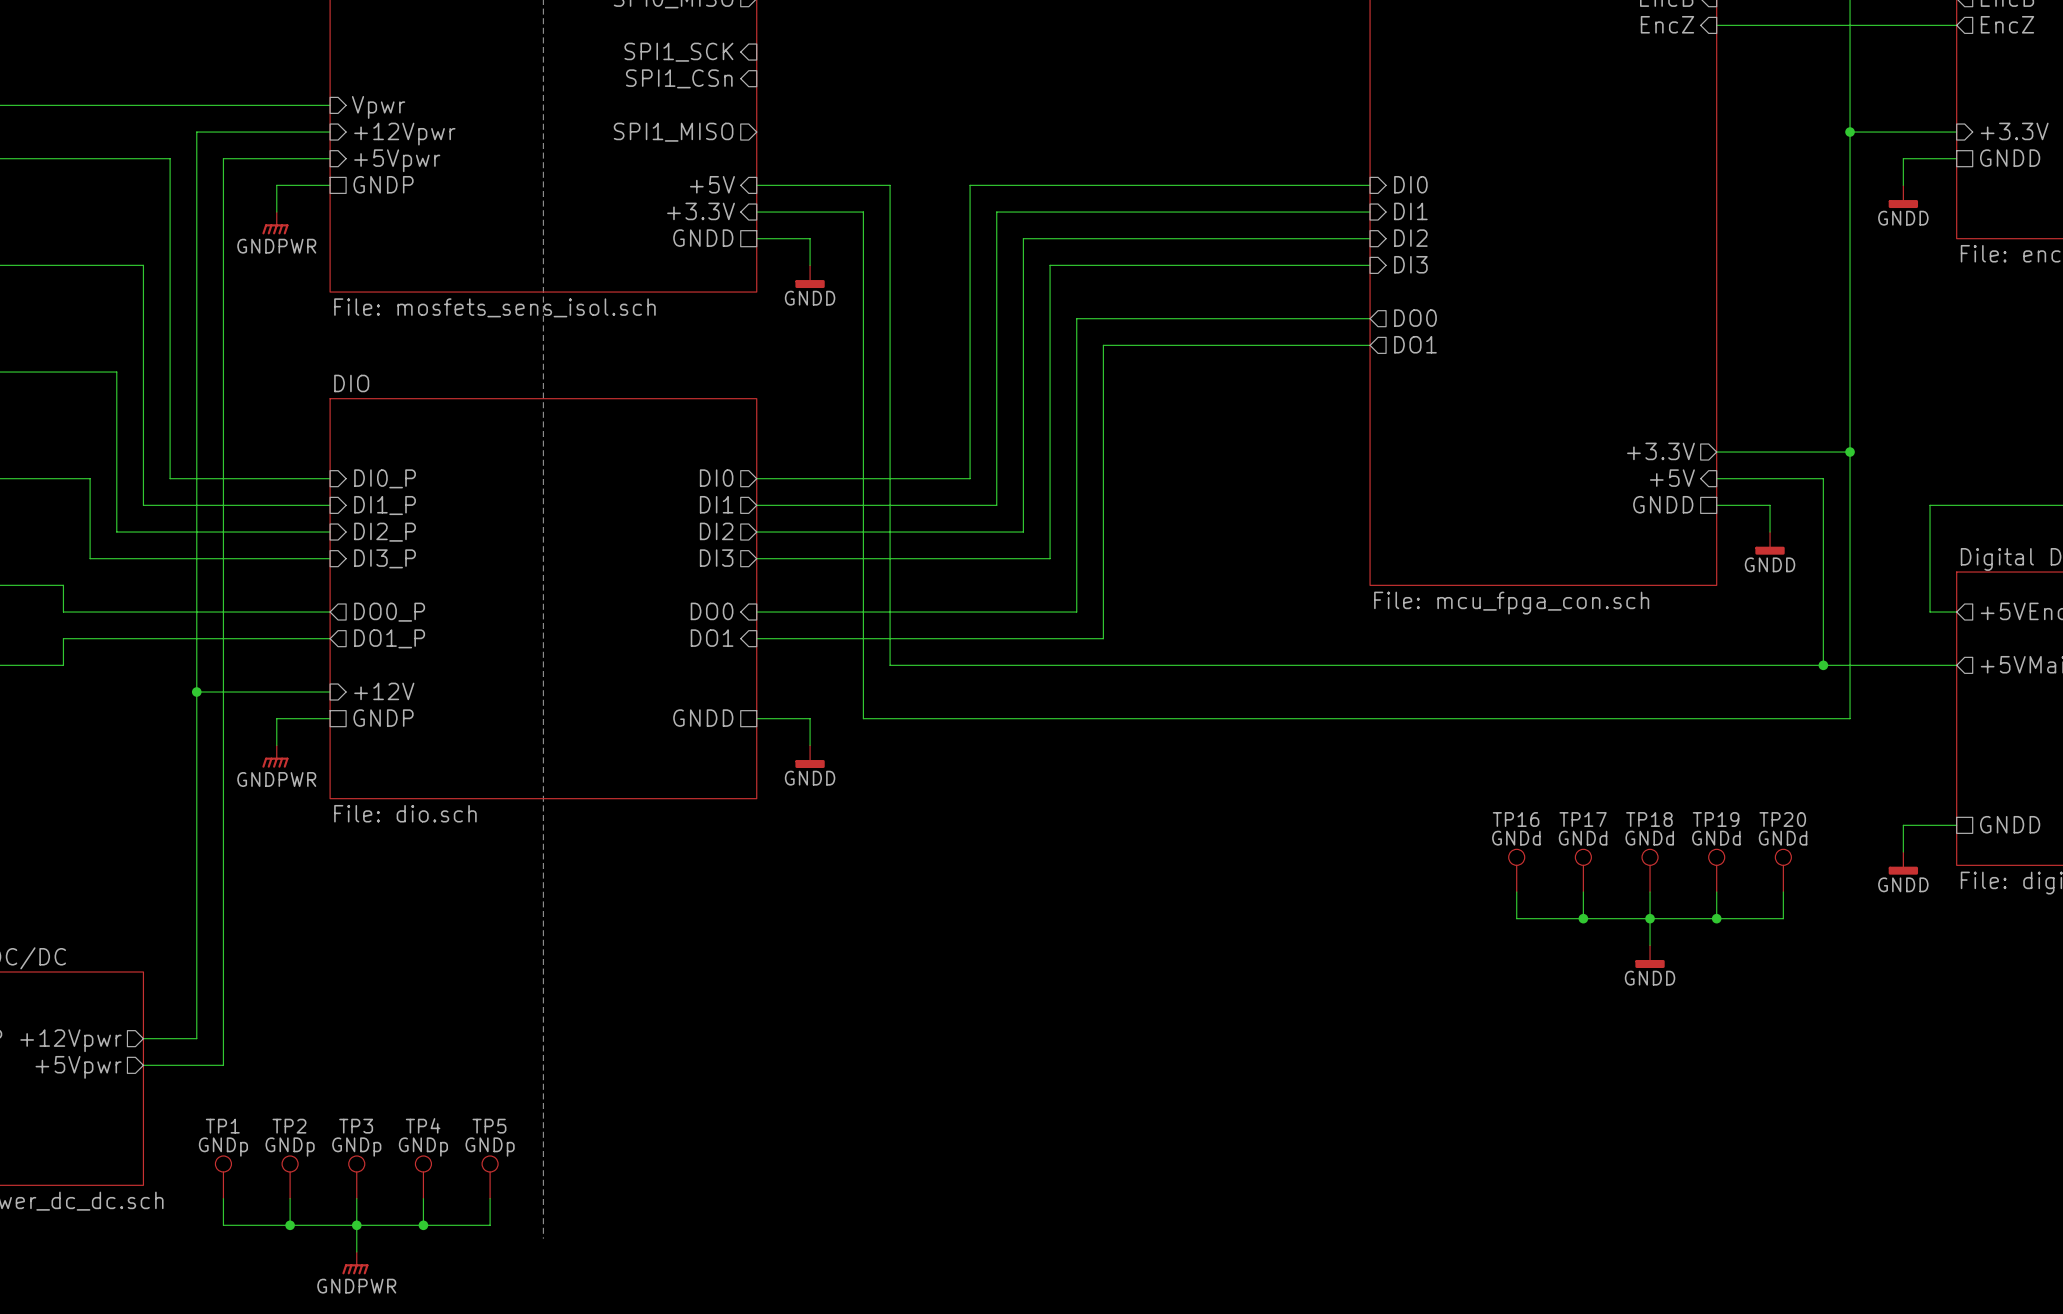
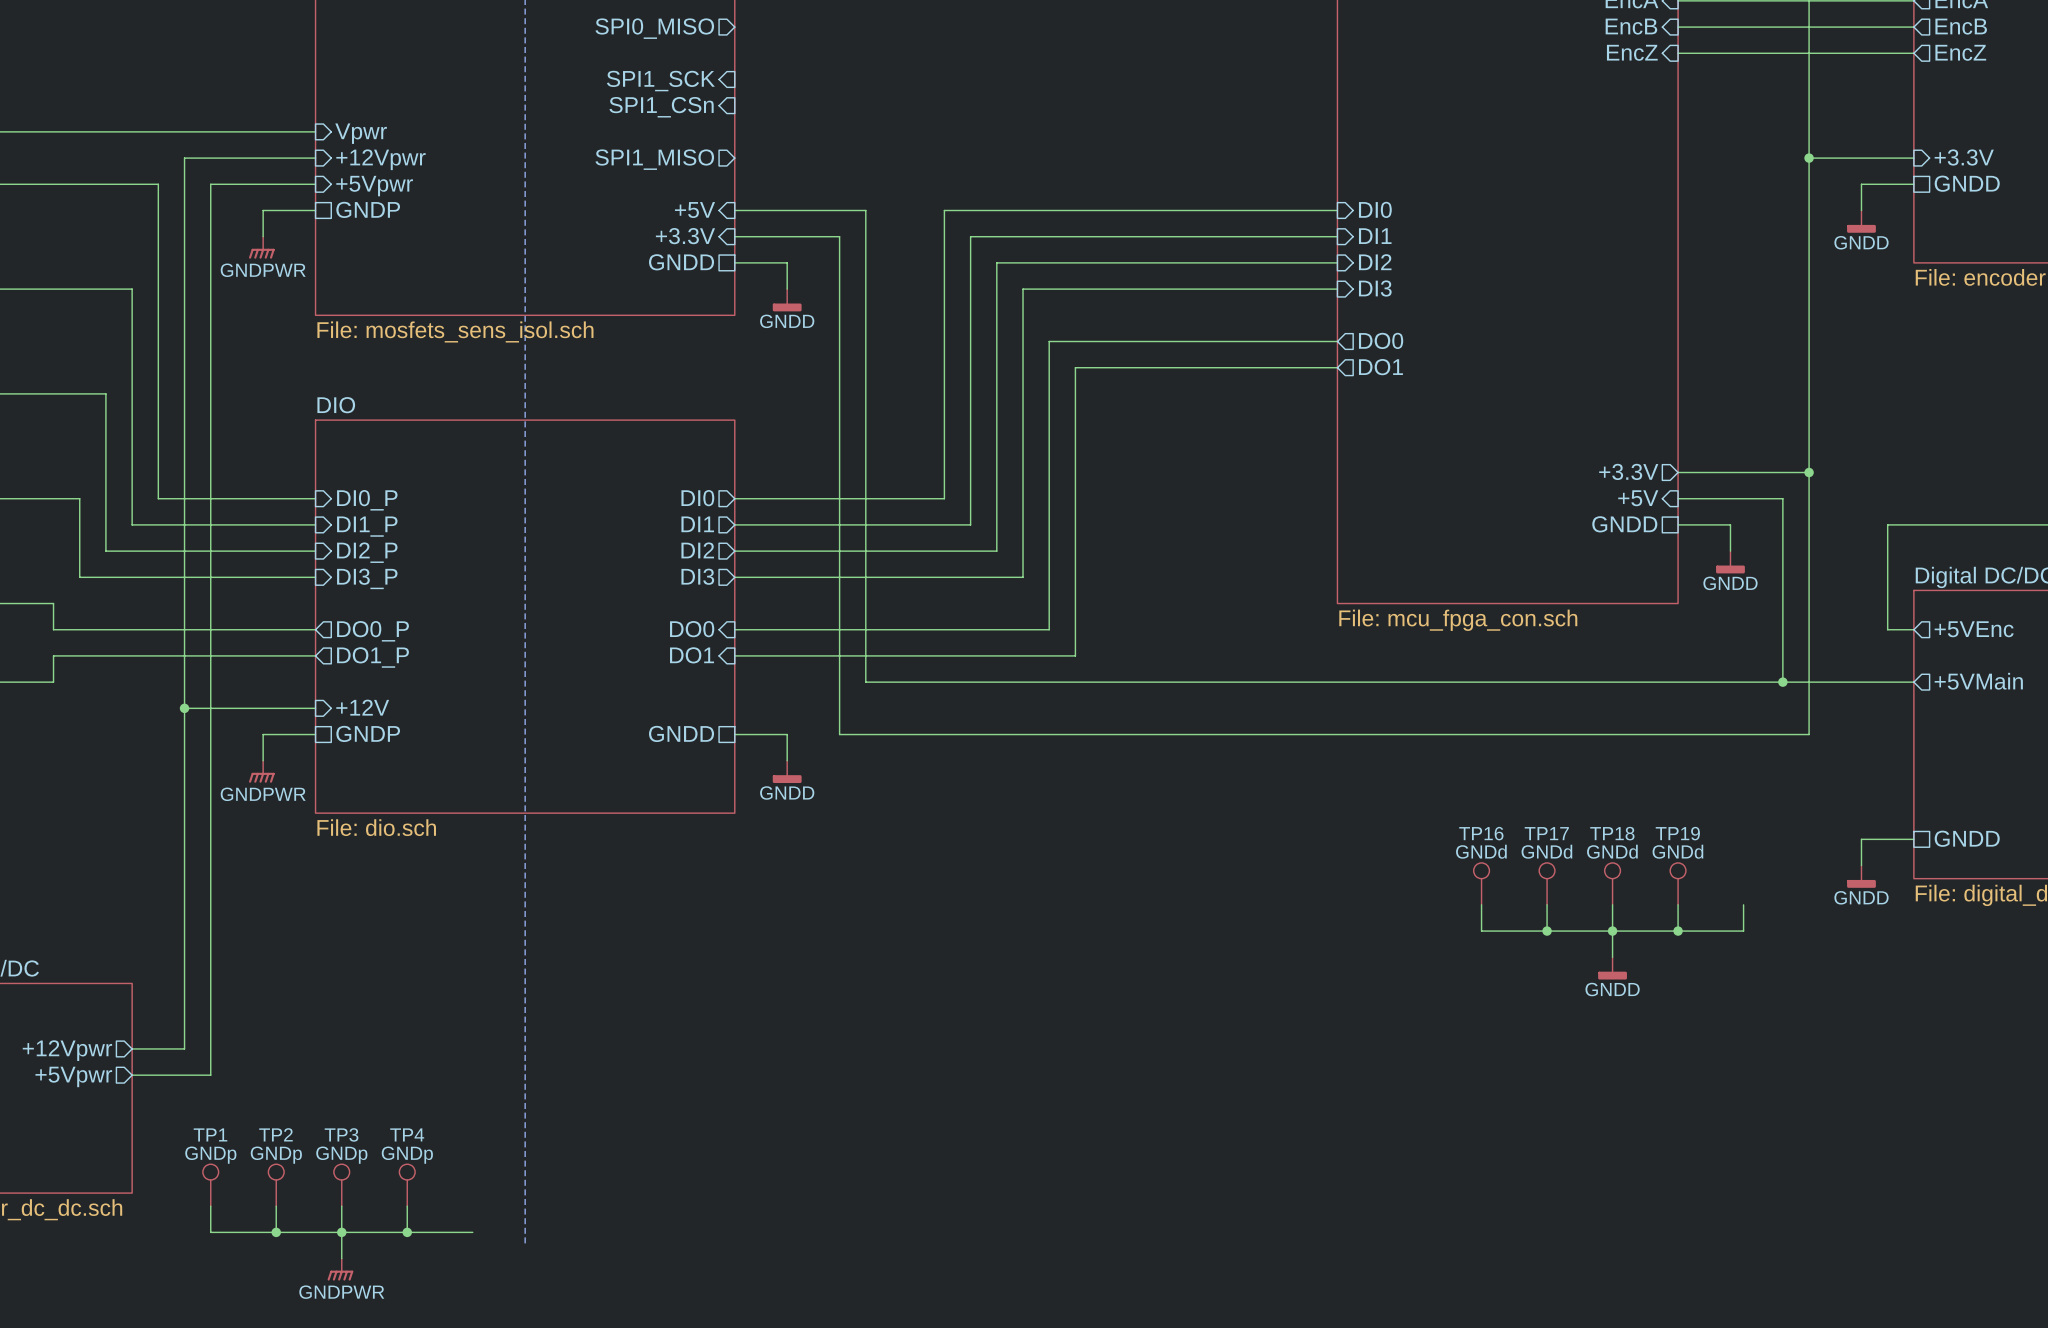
TP20: GNDd (1783, 870) -> none
TP5: GNDp (490, 1177) -> none
wire: (490, 1198) (490, 1225) -> none

